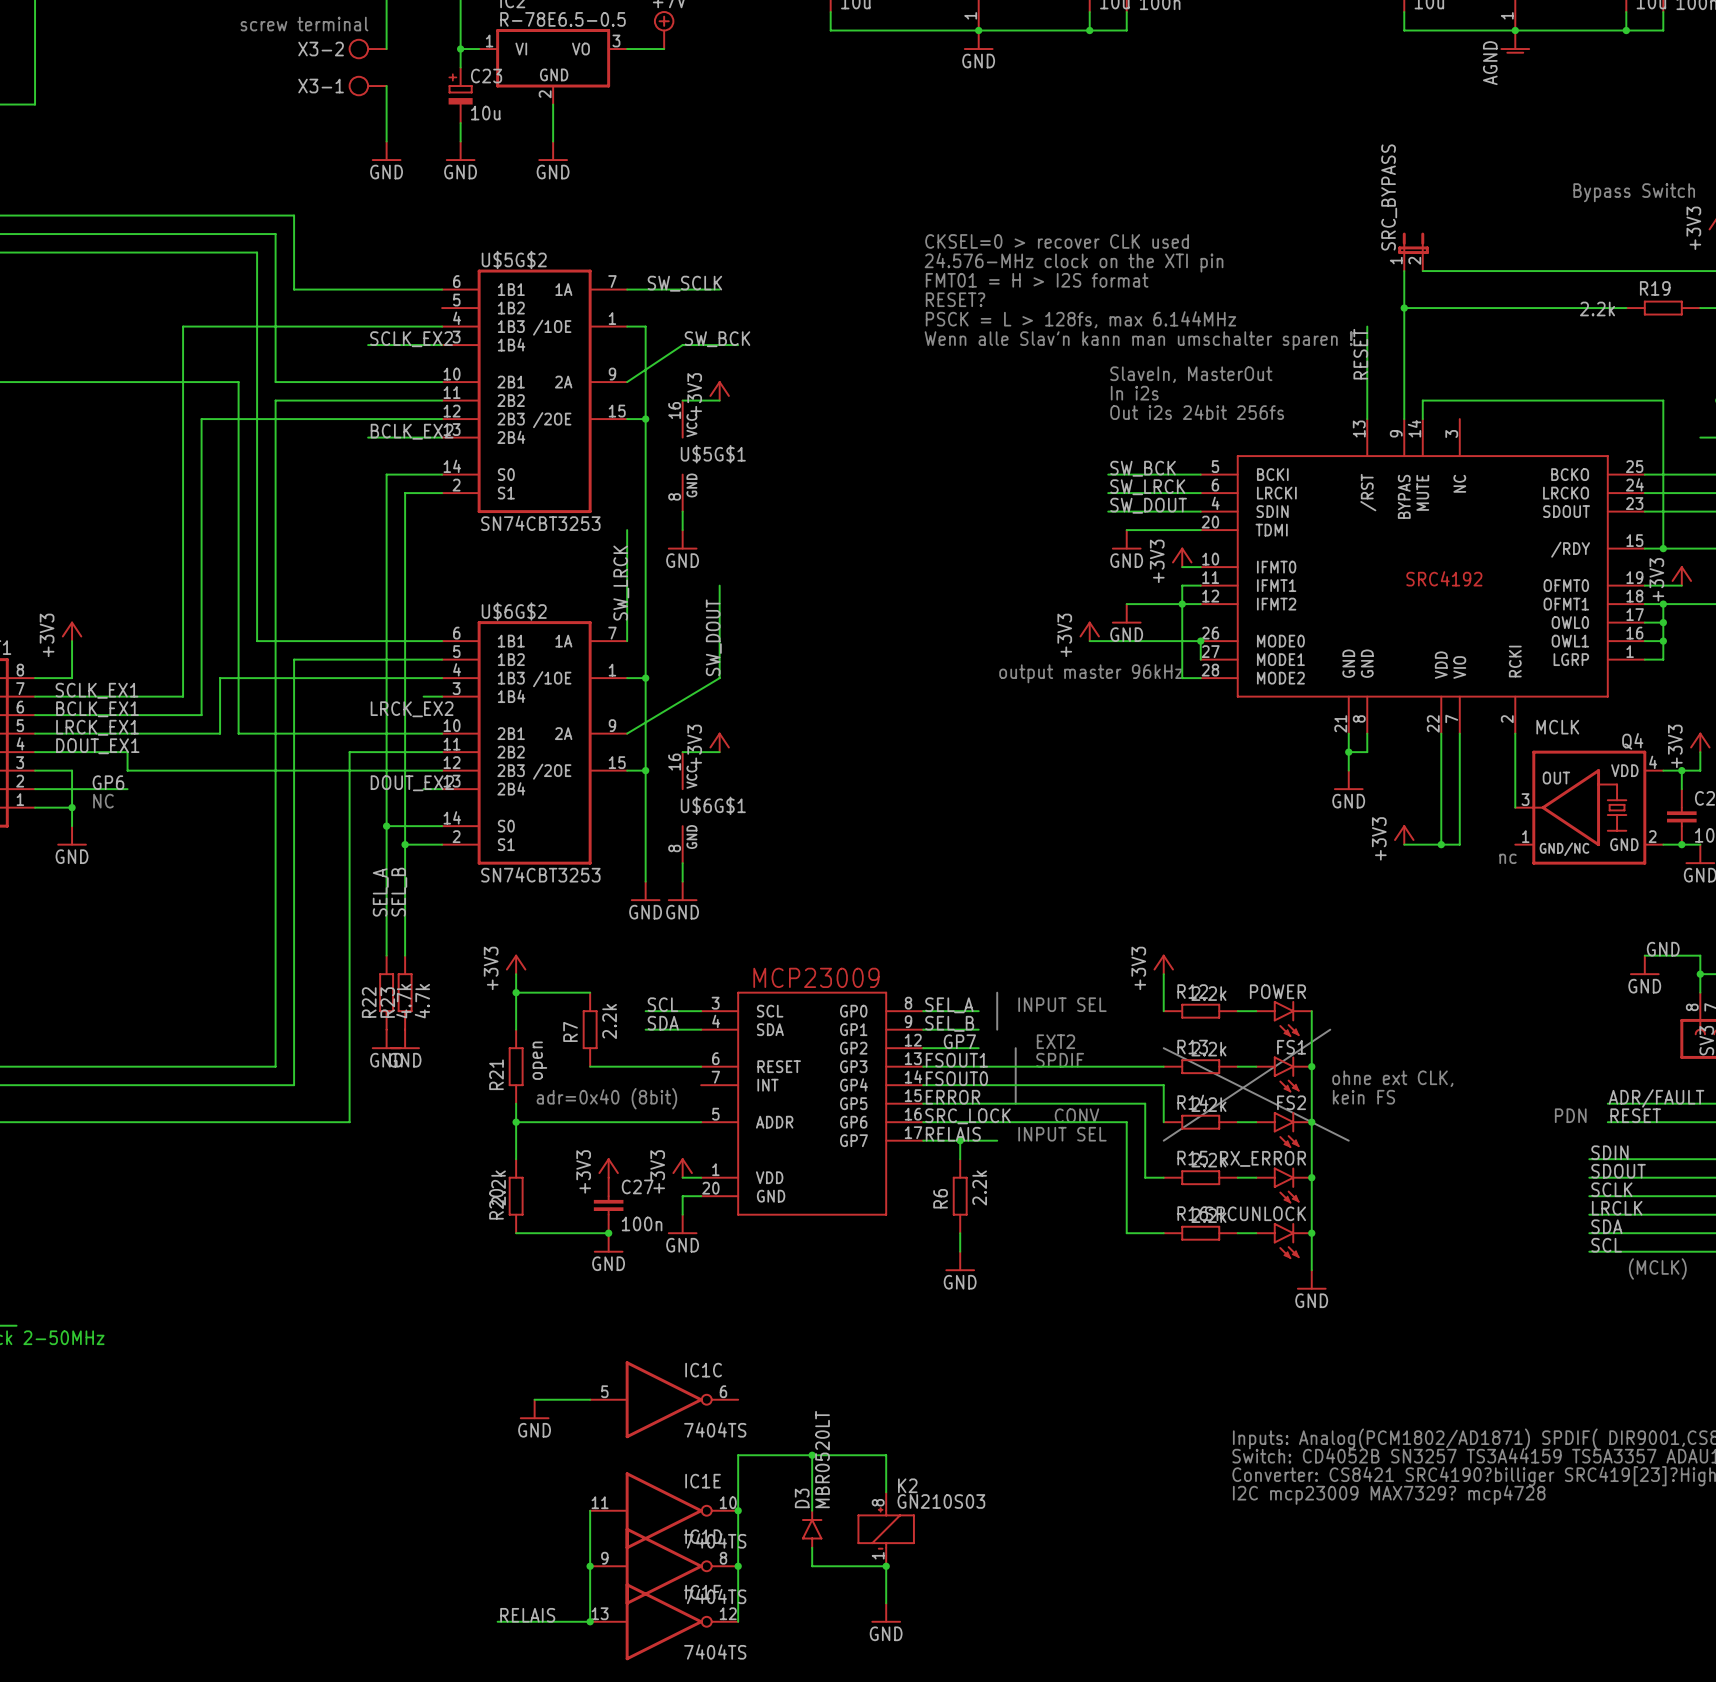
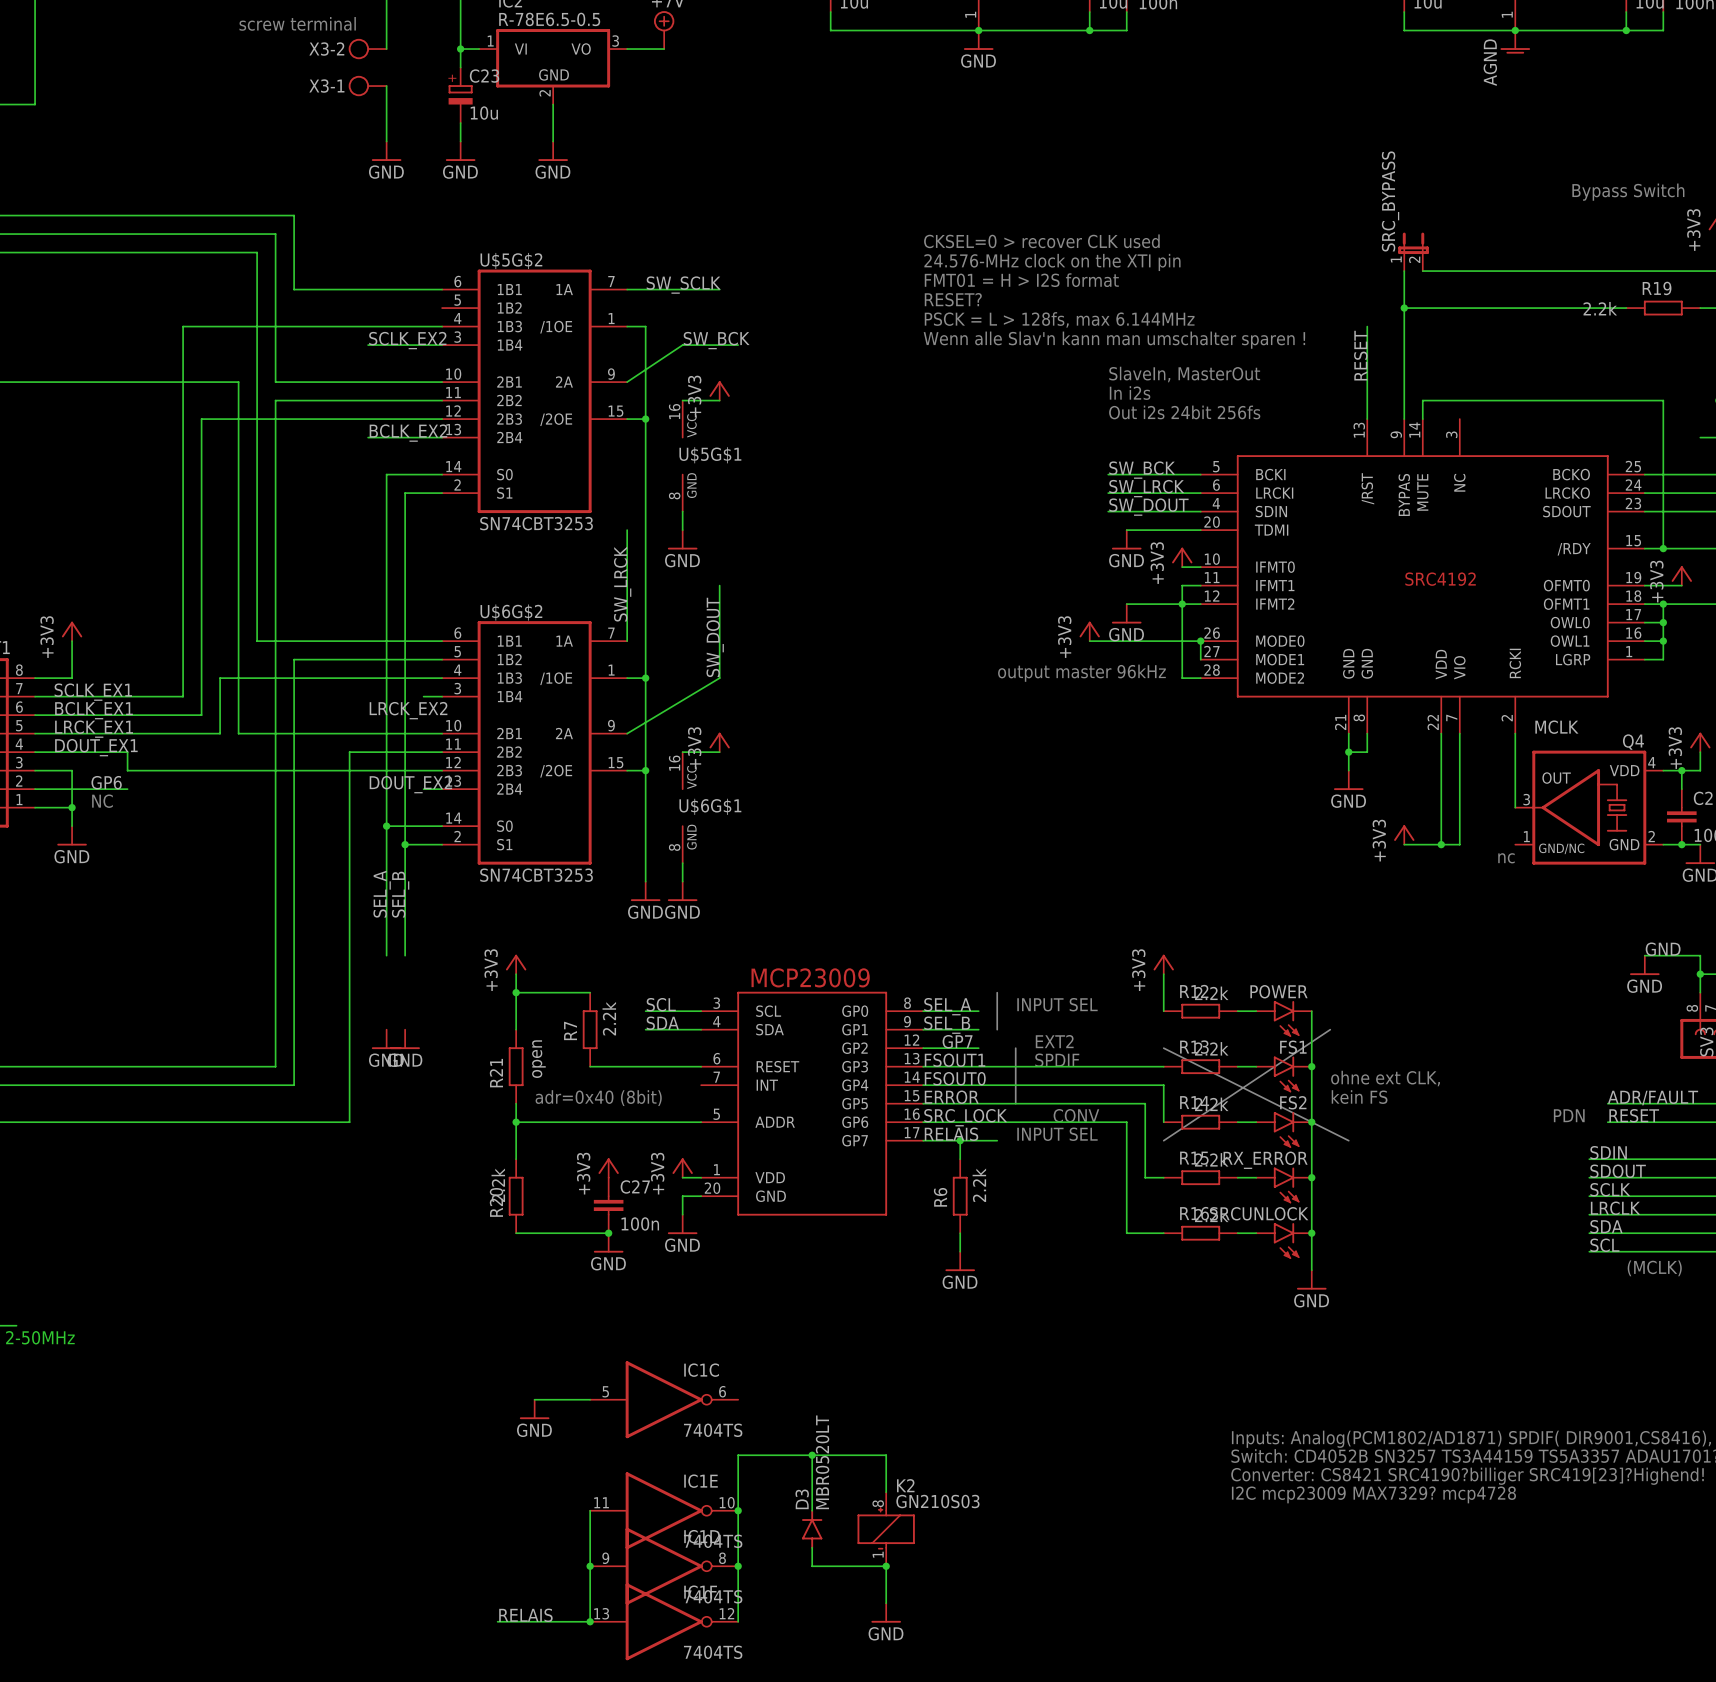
R22: 4.7k (386, 992) -> none
R23: 4.7k (405, 992) -> none

